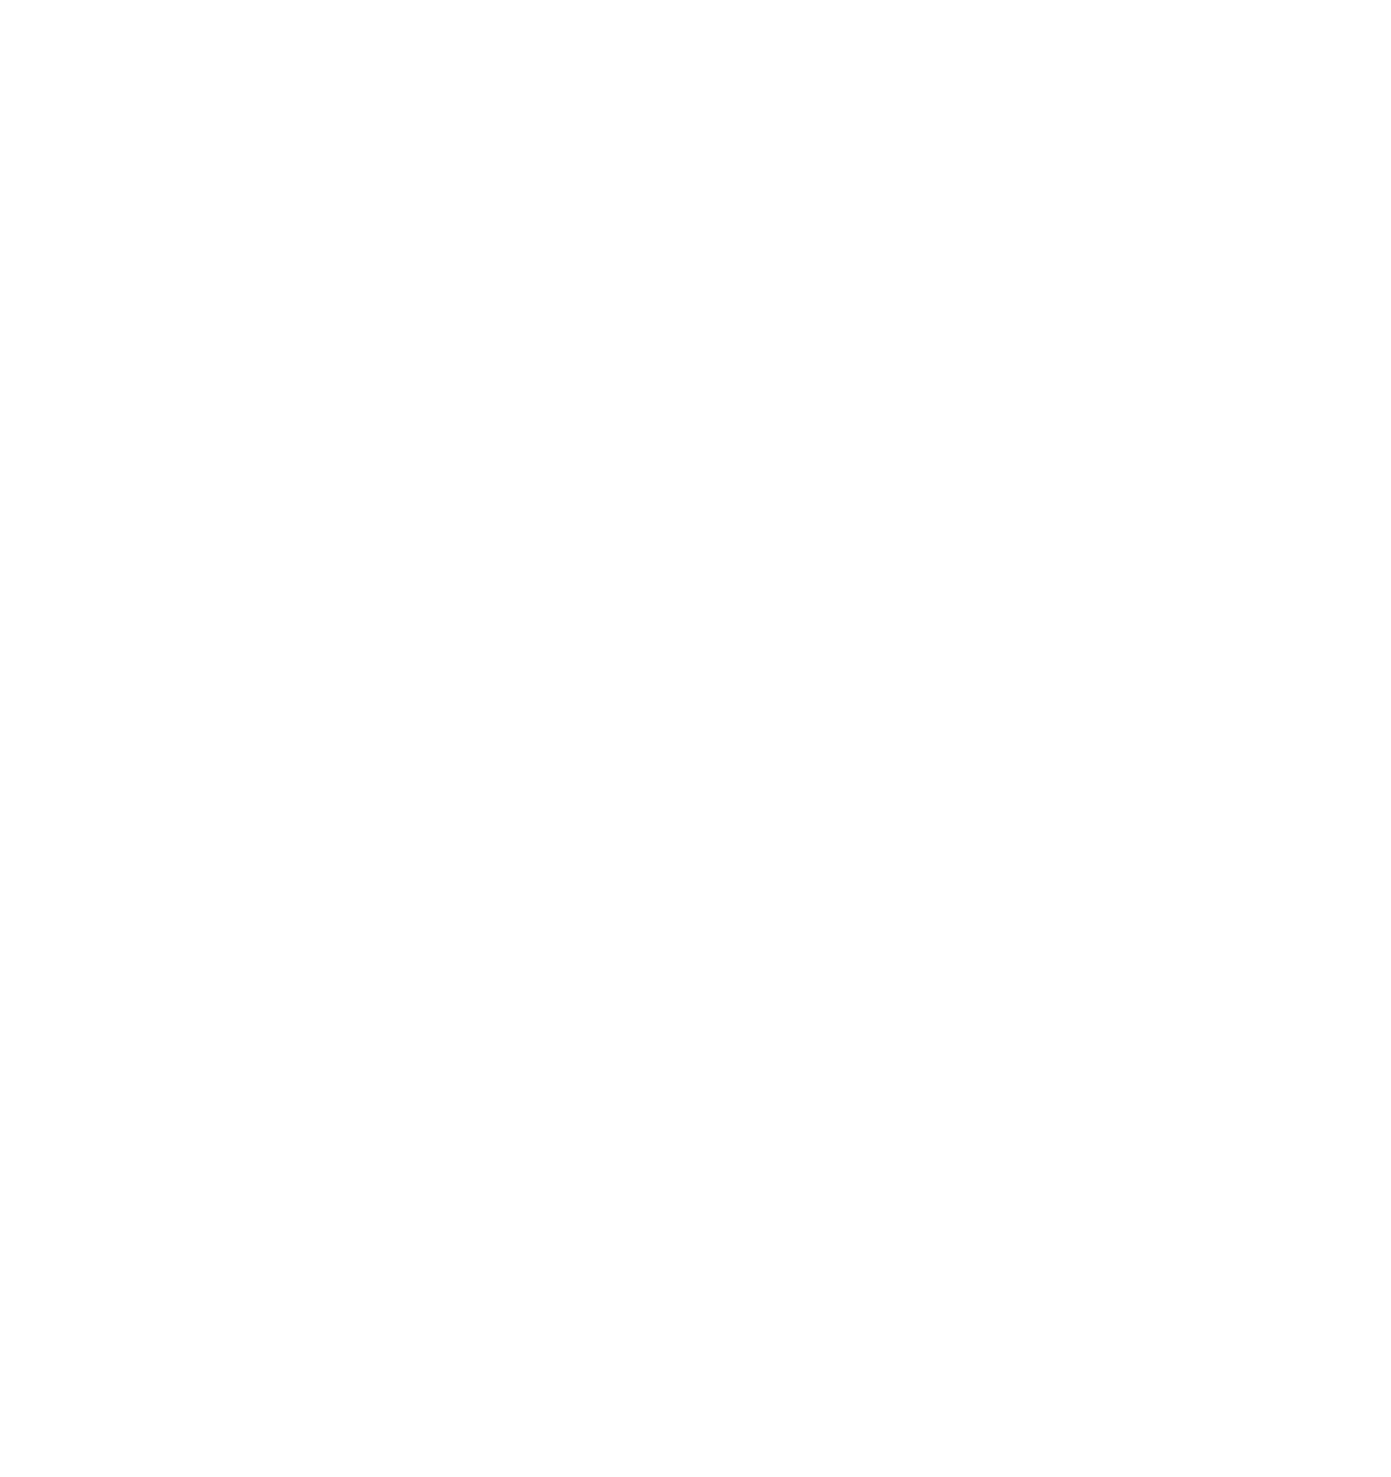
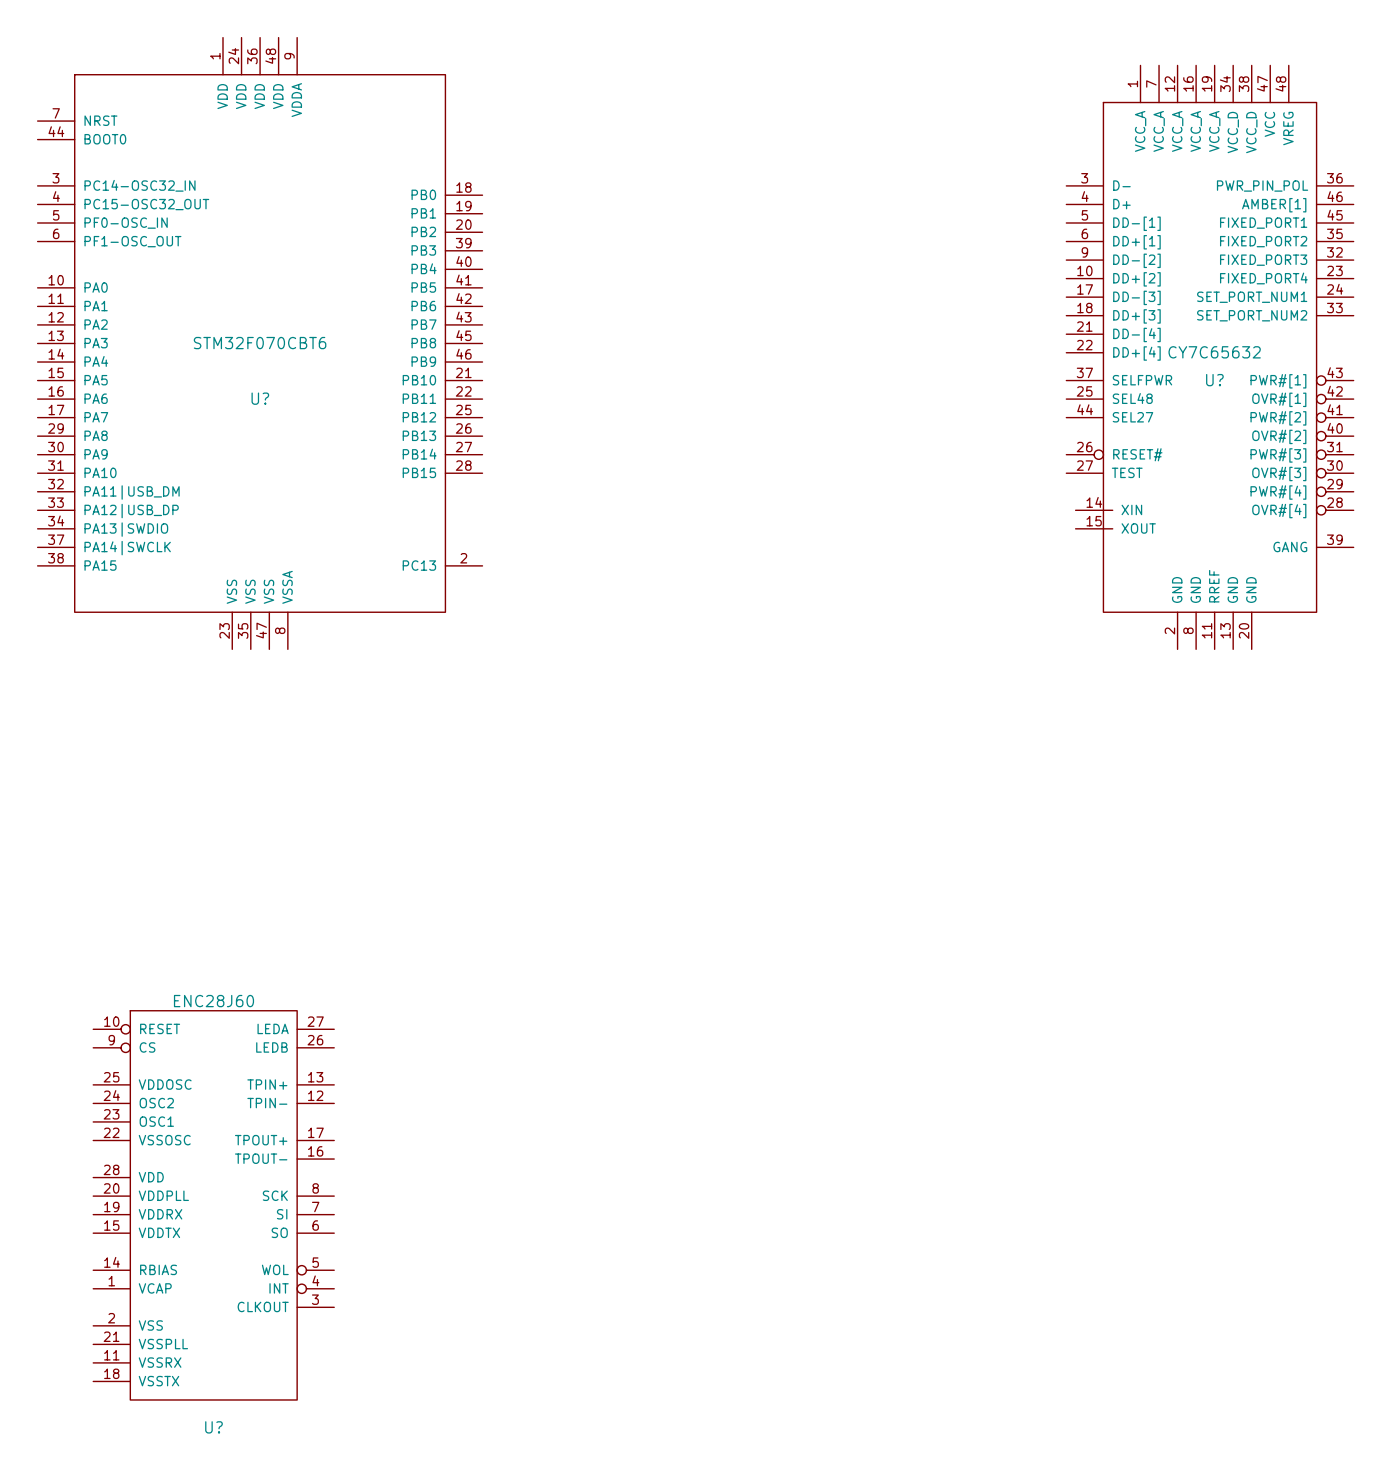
U?: none -> STM32F070CBT6 (260, 343)
U?: none -> CY7C65632 (1210, 357)
U?: none -> ENC28J60 (213, 1205)

